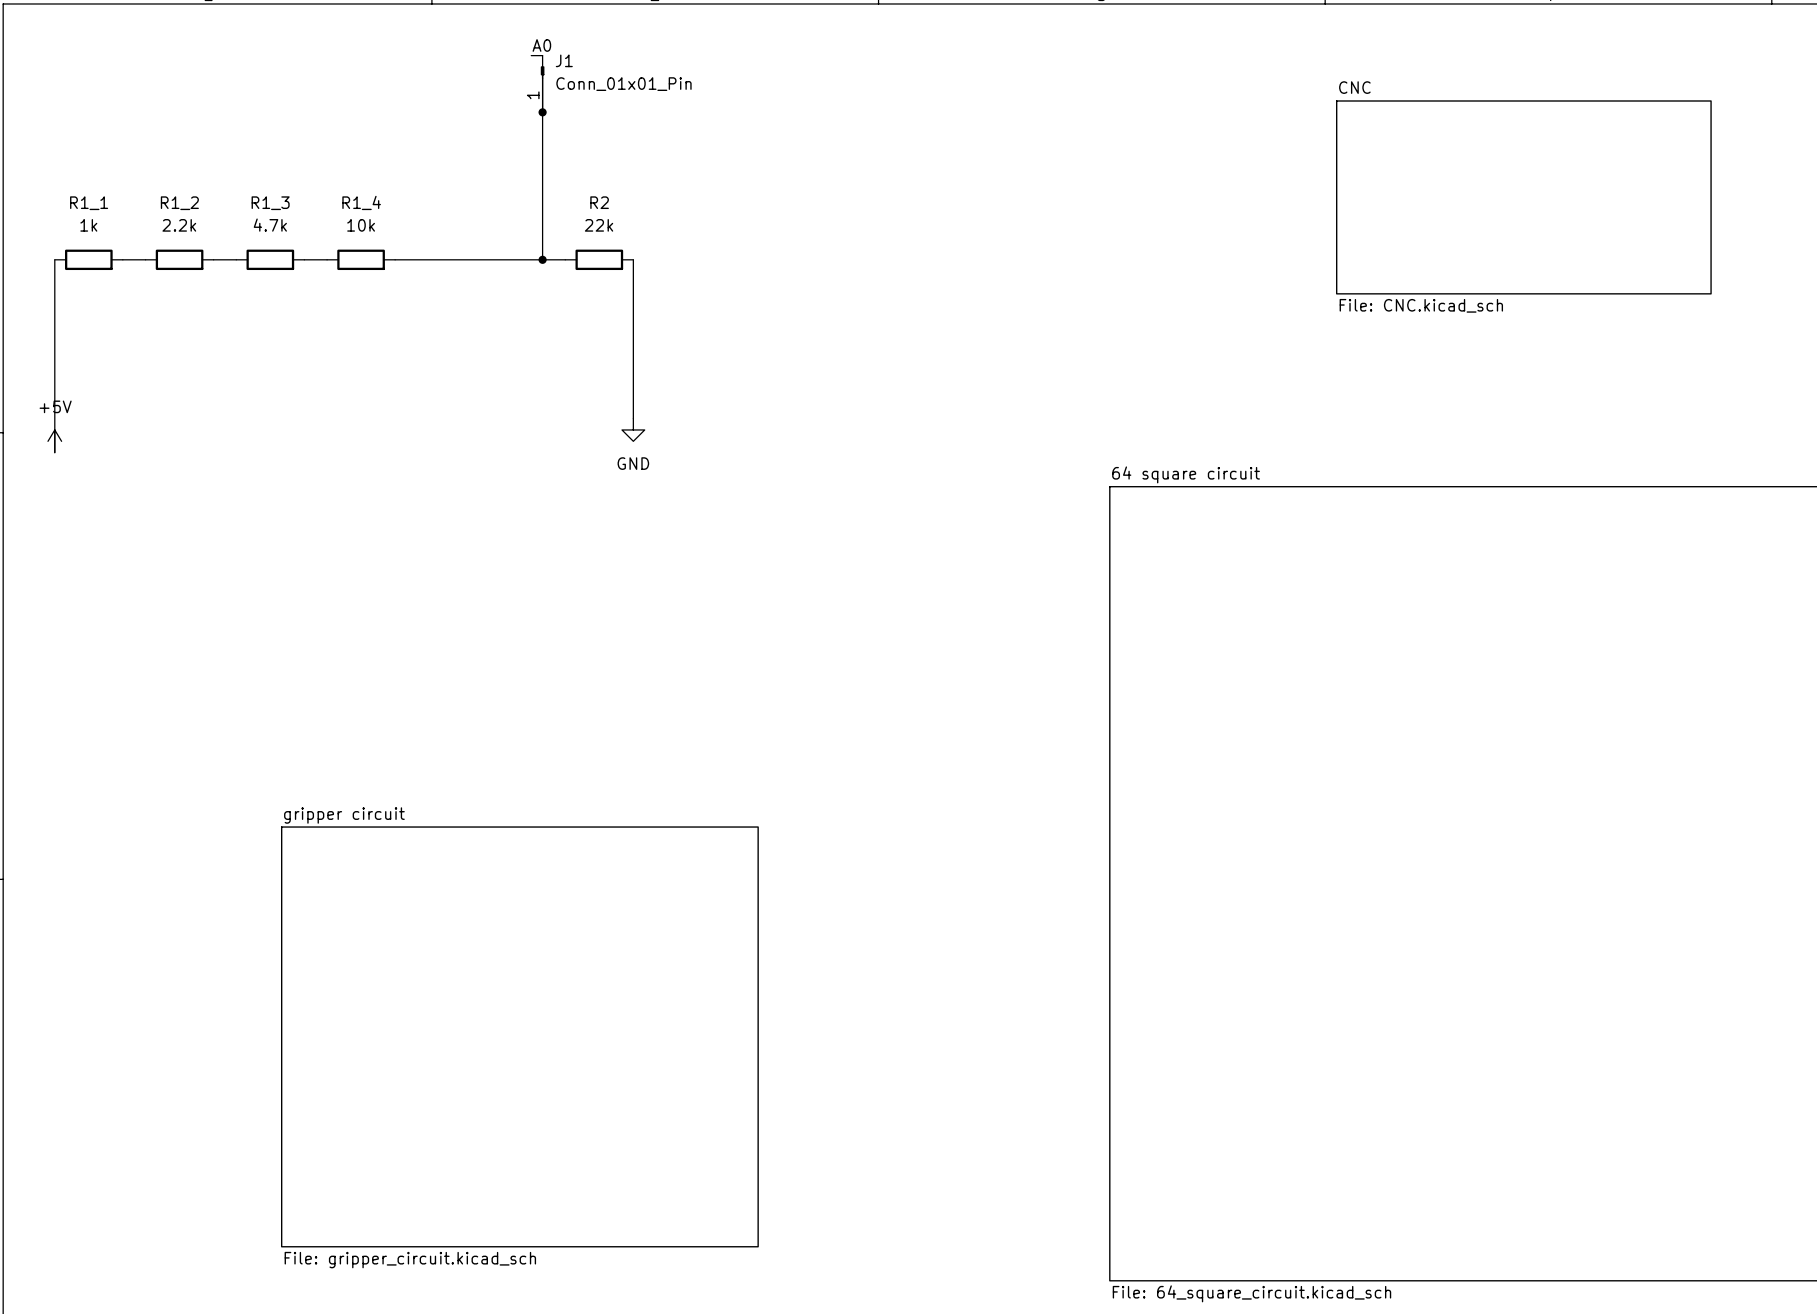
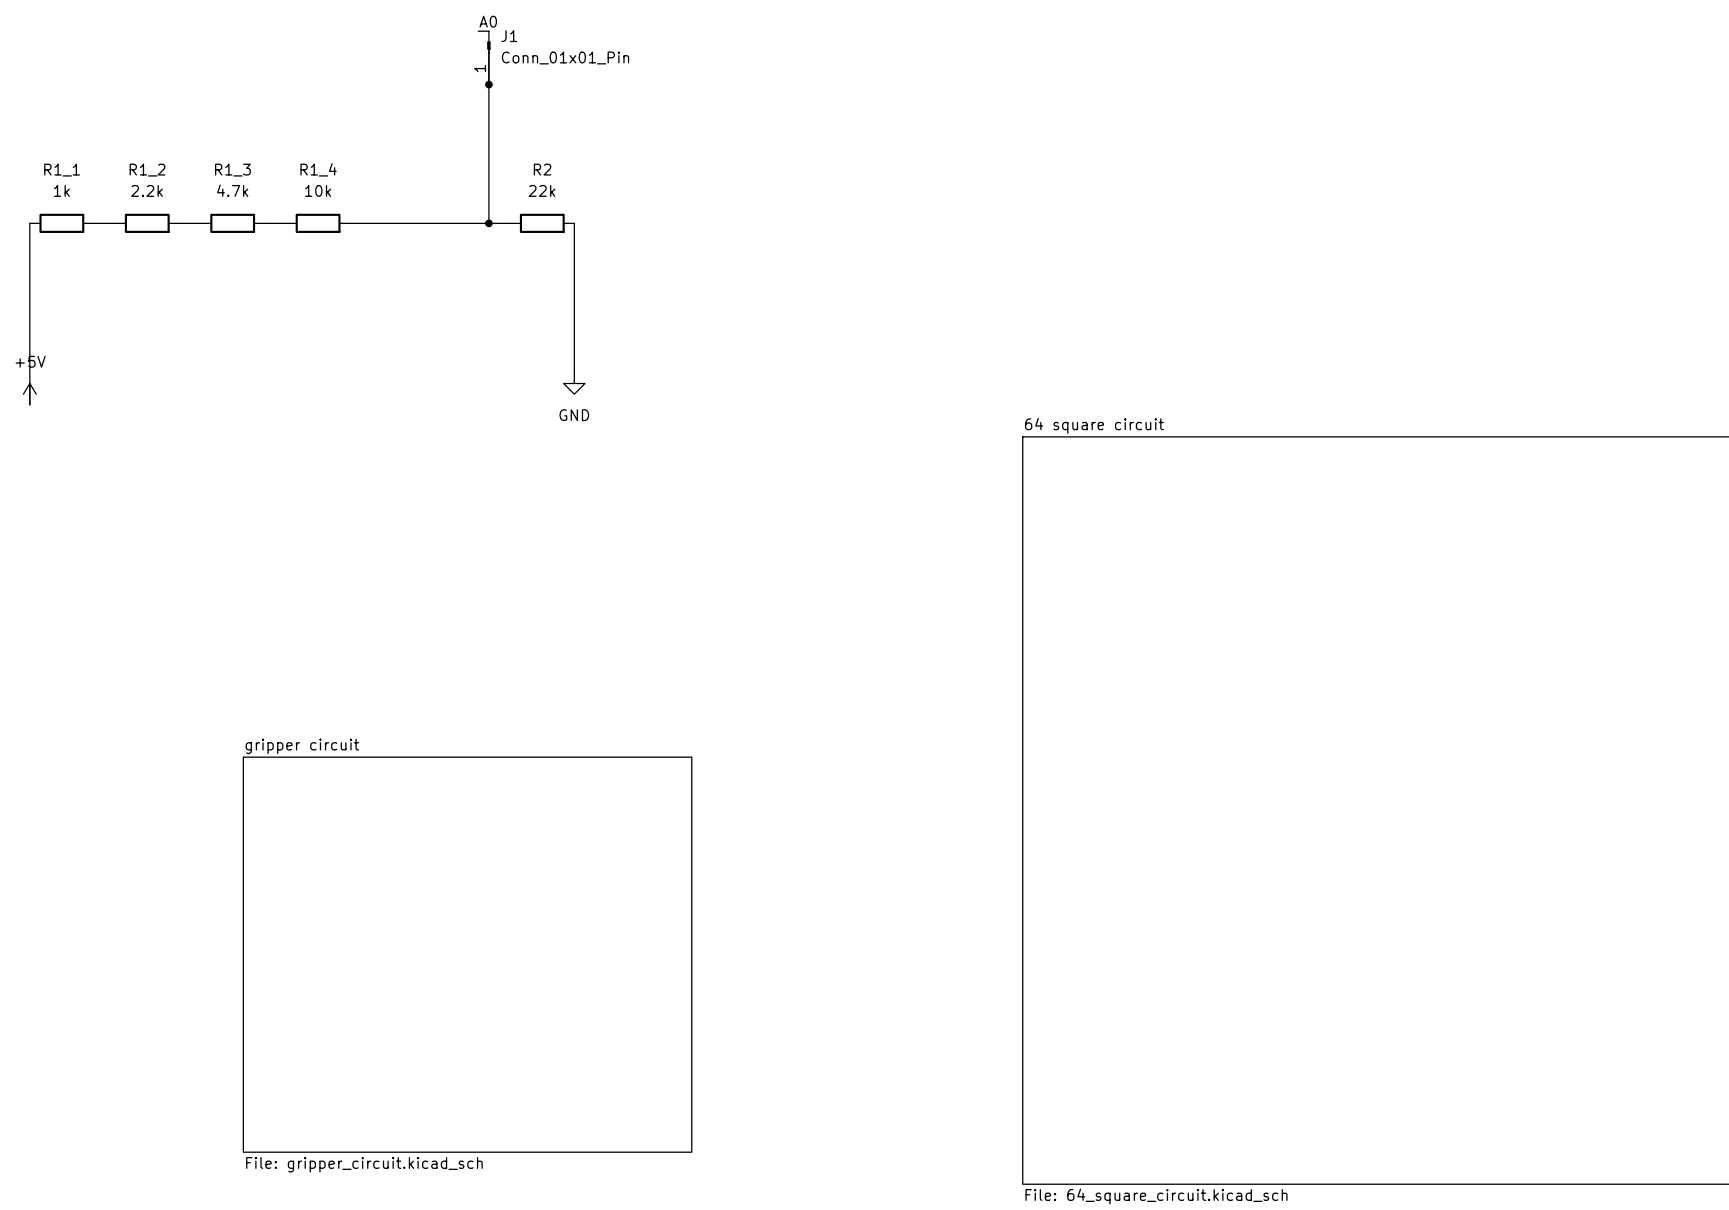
sheet CNC: File: CNC.kicad_sch (1523, 197) -> none

